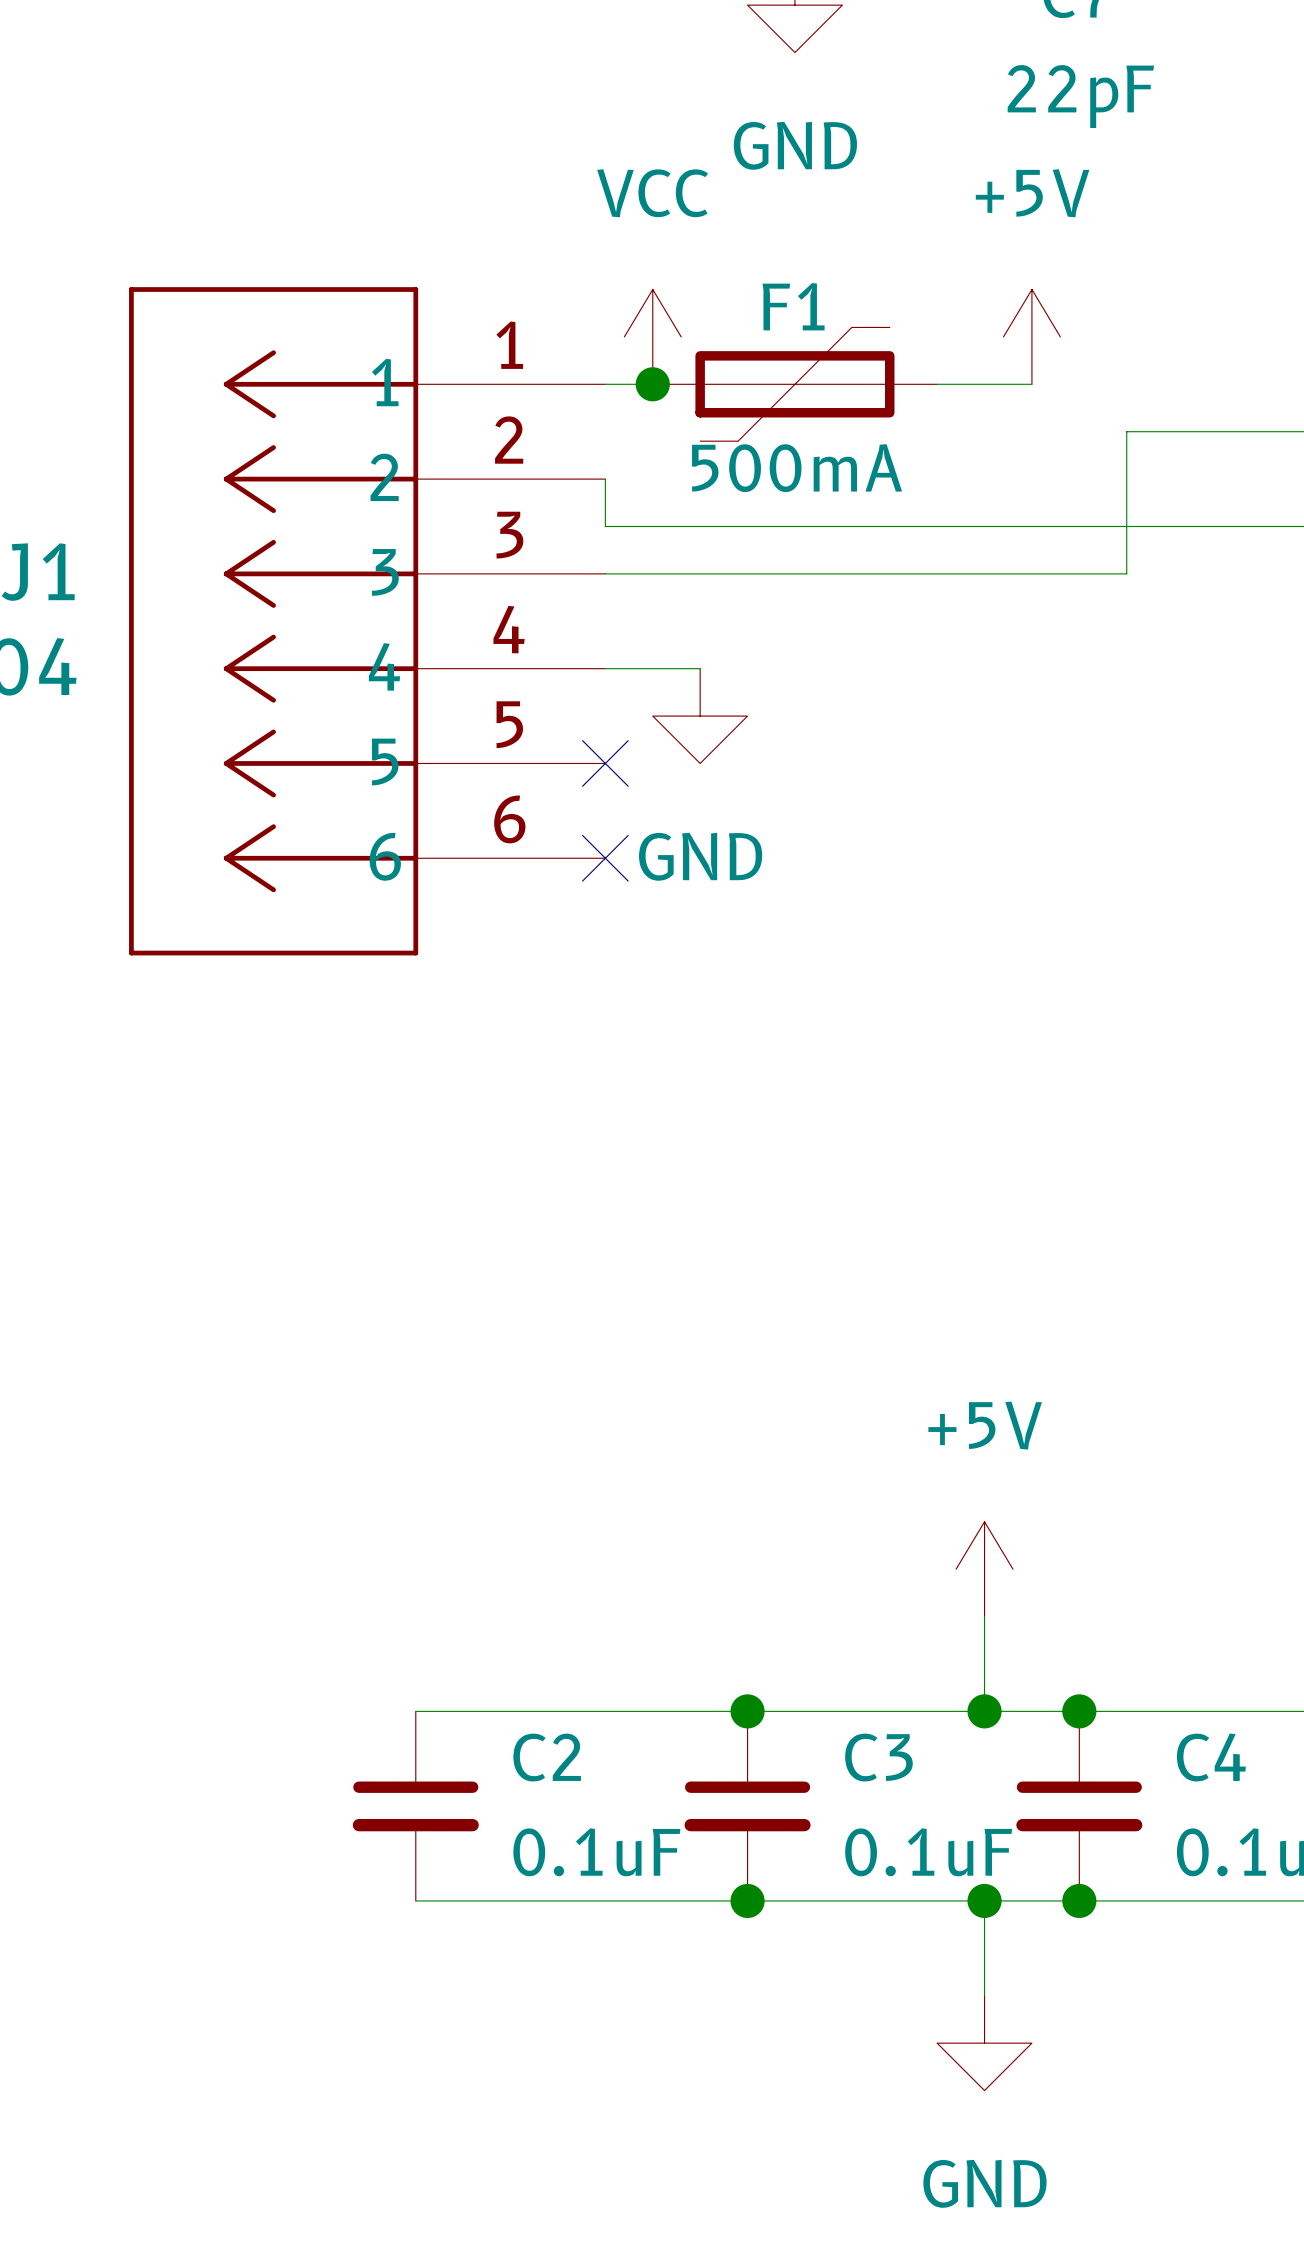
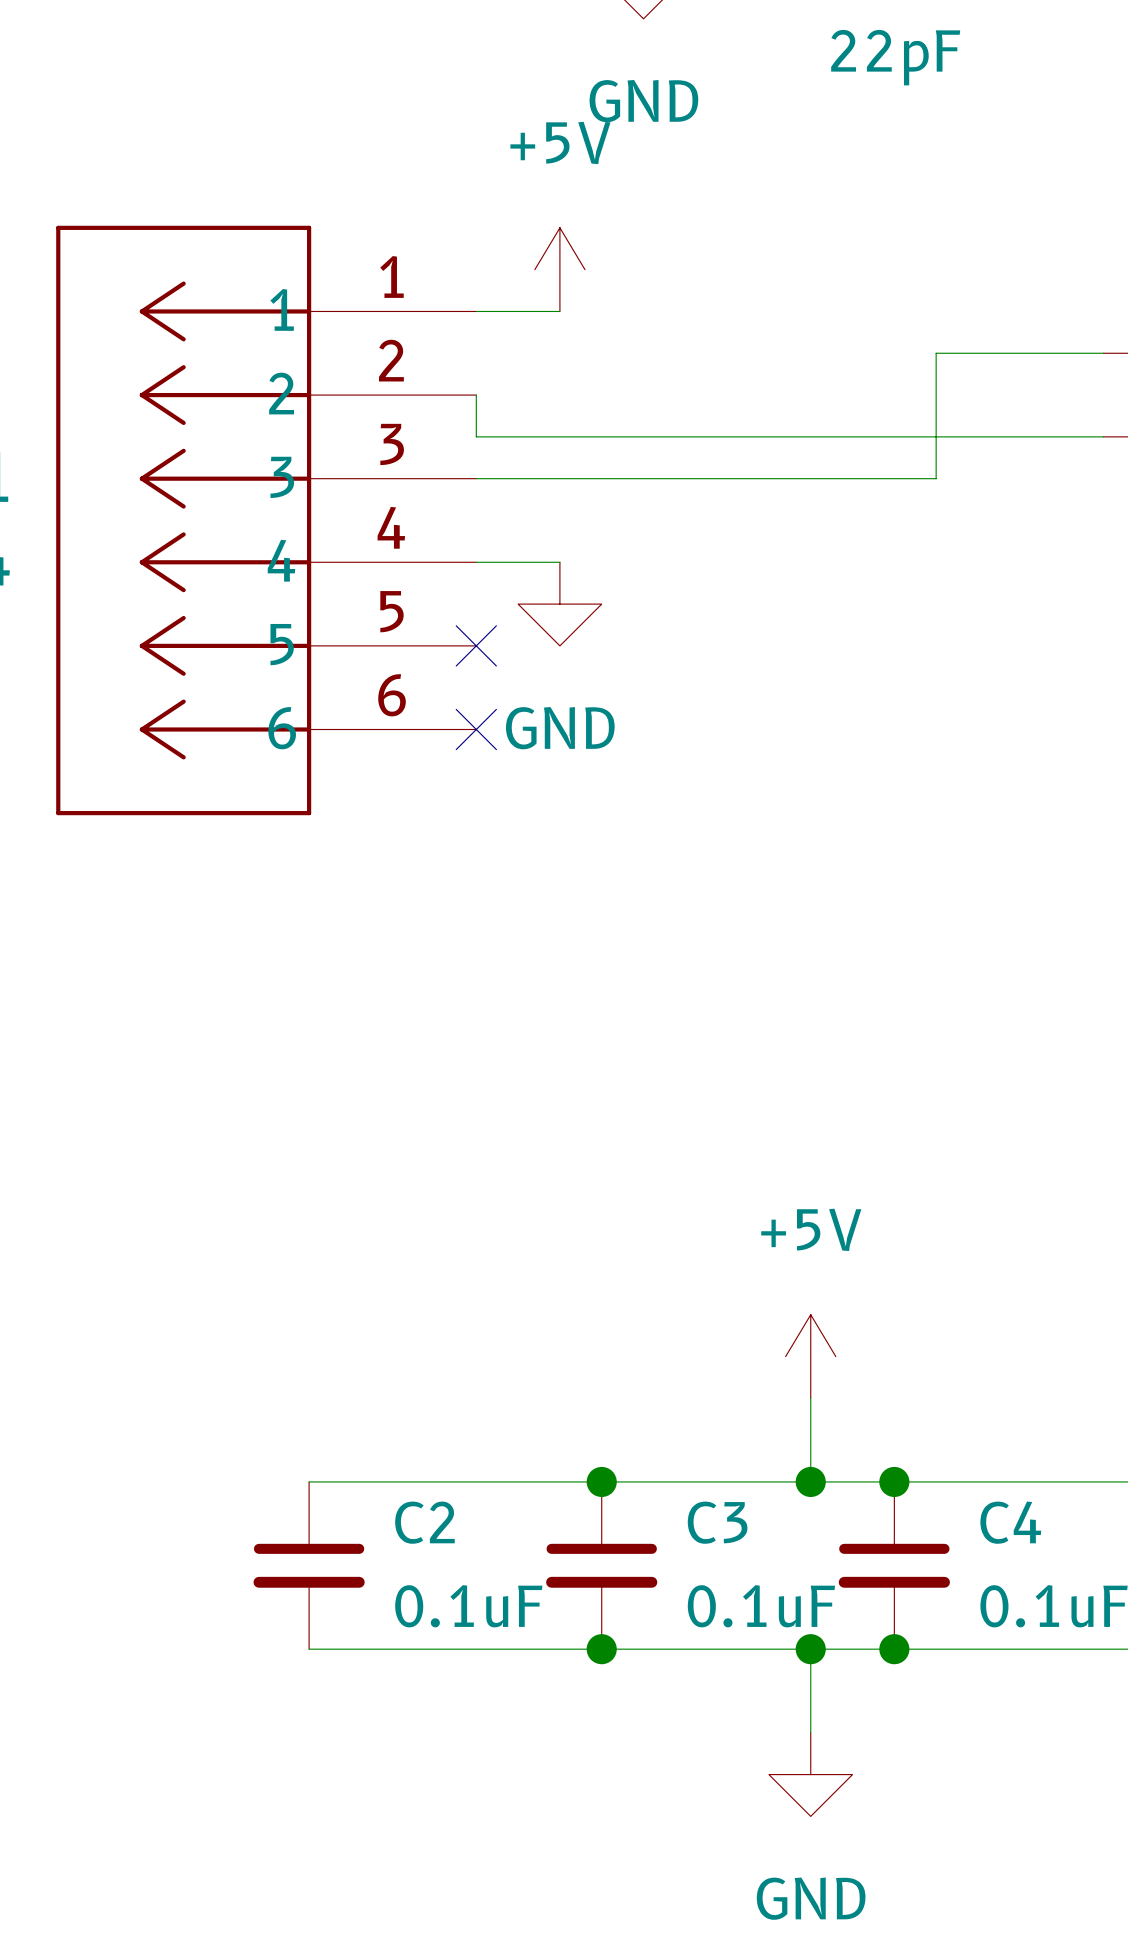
power symbol: VCC (652, 336) -> none
power symbol position: +5V (1031, 336) -> +5V (559, 269)
junction: (652, 384) -> none
F1: 500mA (794, 384) -> none
wire: (937, 384) (1031, 384) -> none

